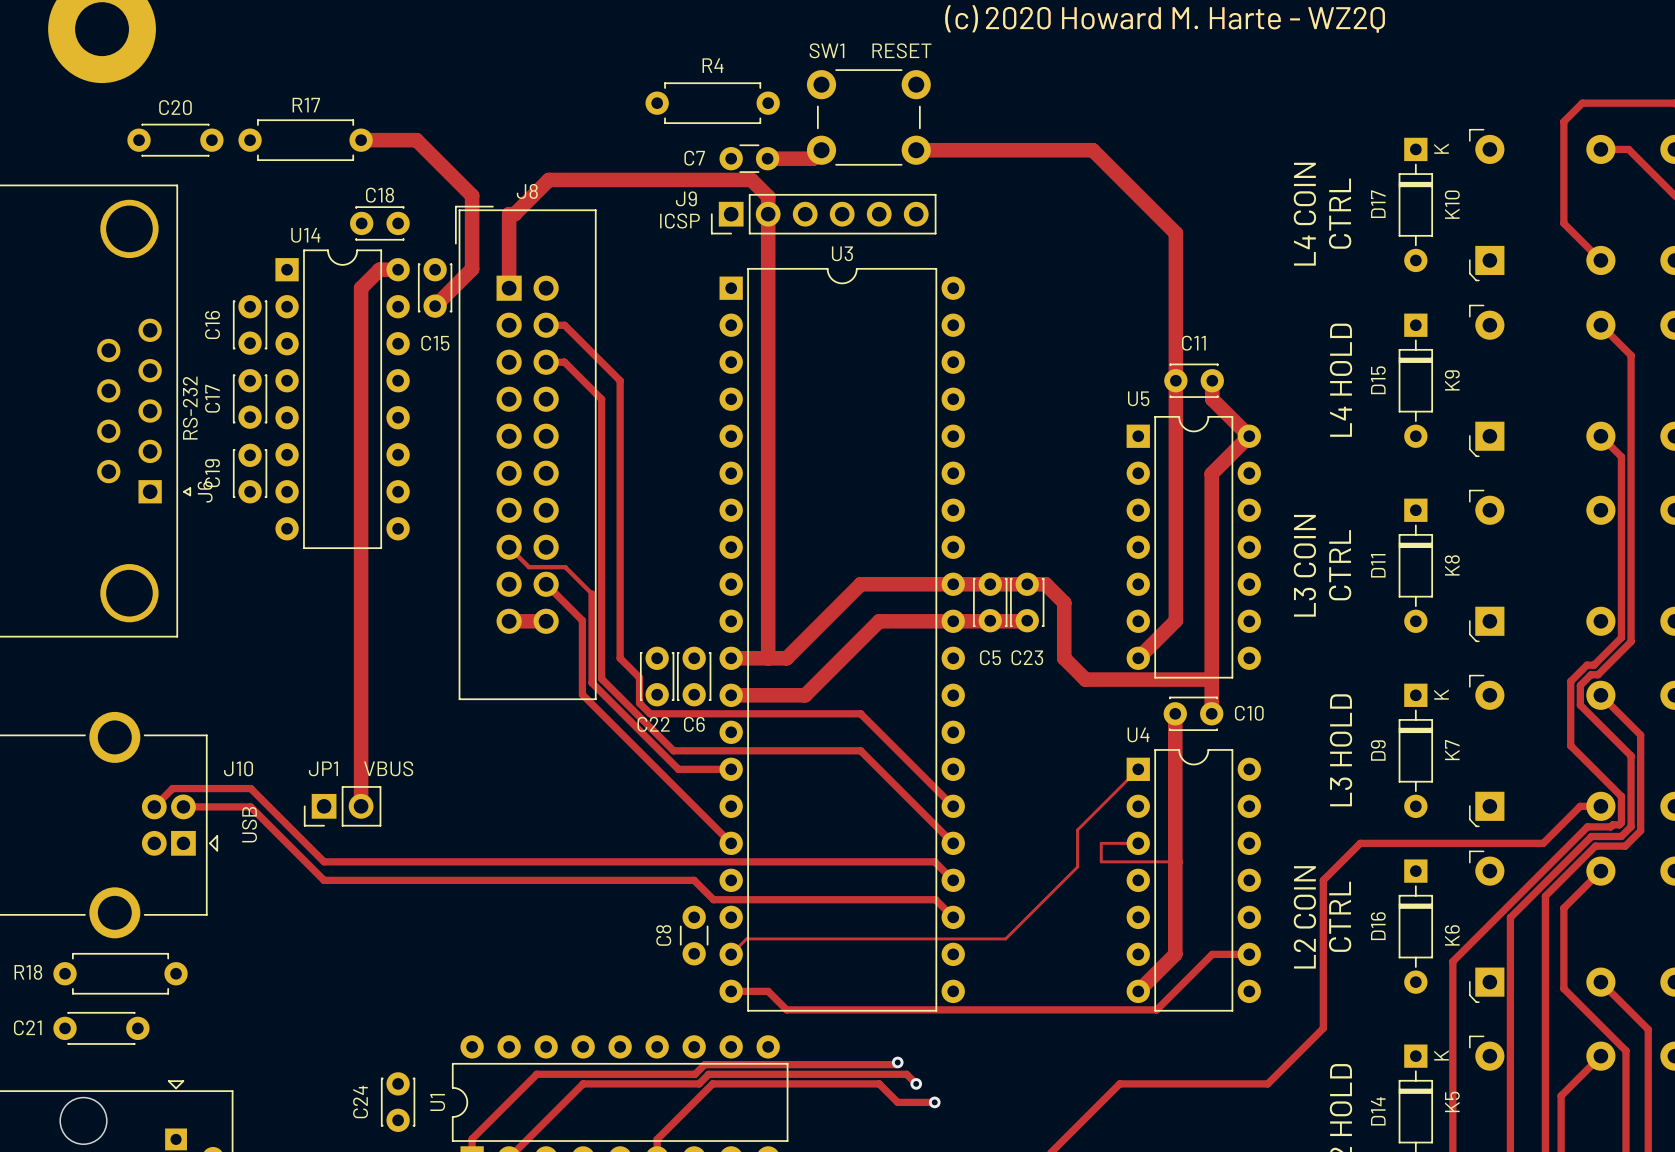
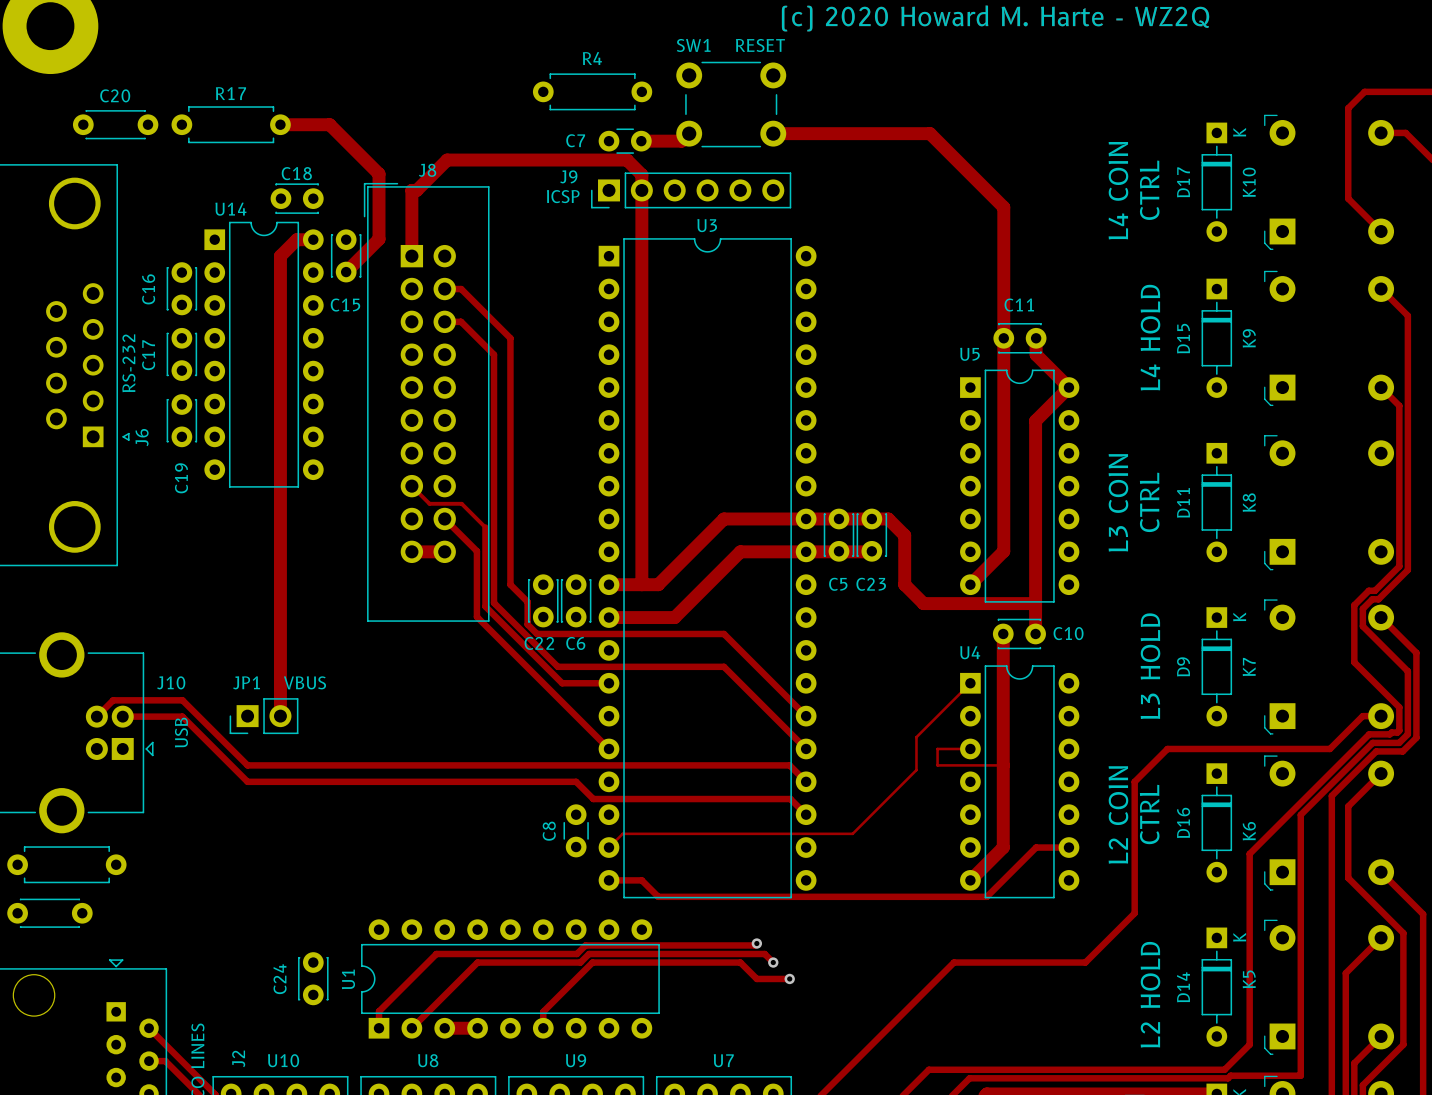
C19 name position: C19 (212, 473) -> C19 (181, 478)

